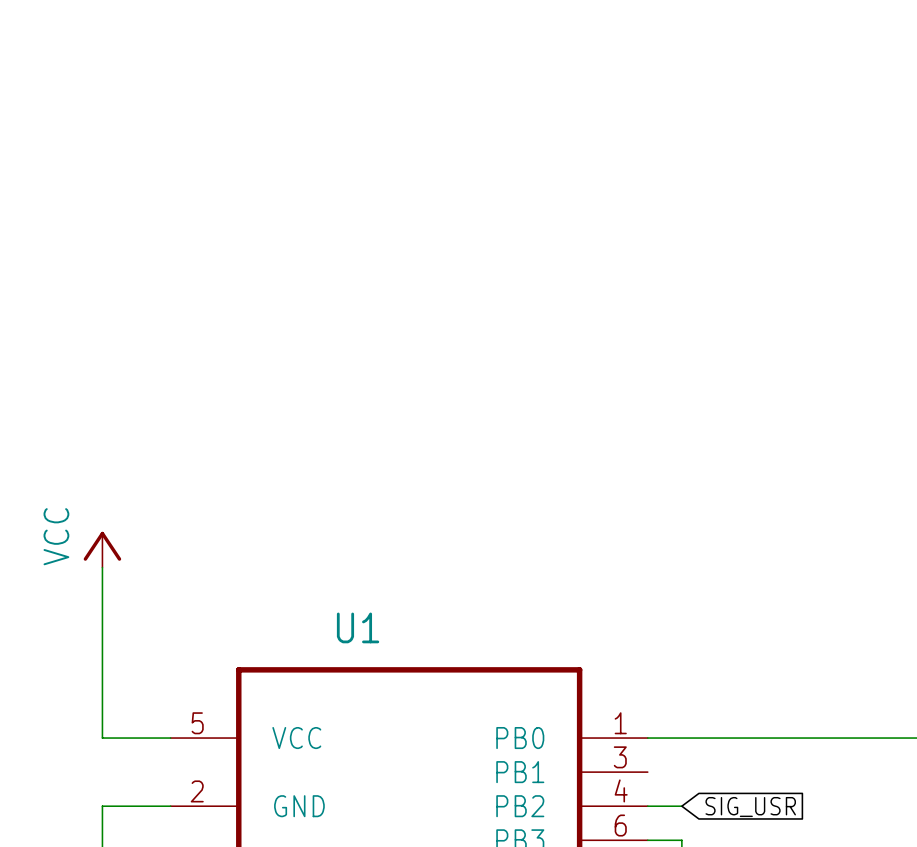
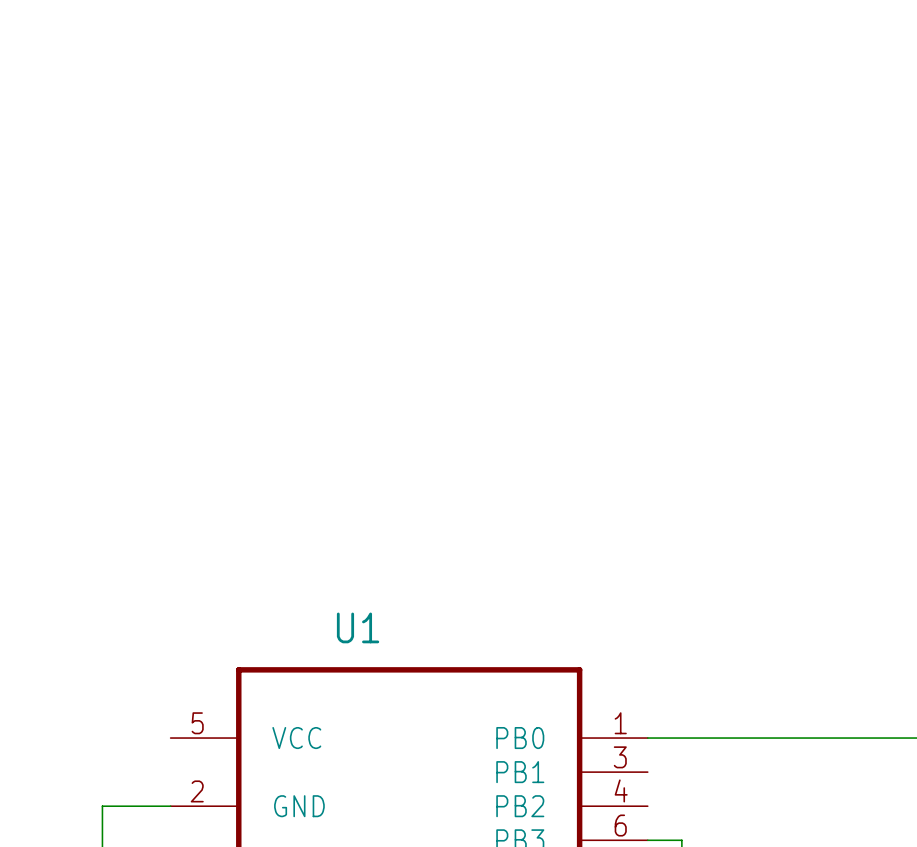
power symbol: VCC (102, 549) -> none
wire: (102, 567) (102, 738) (170, 738) -> none
wire: (647, 806) (681, 806) -> none
global label: SIG_USR (750, 807) -> none

